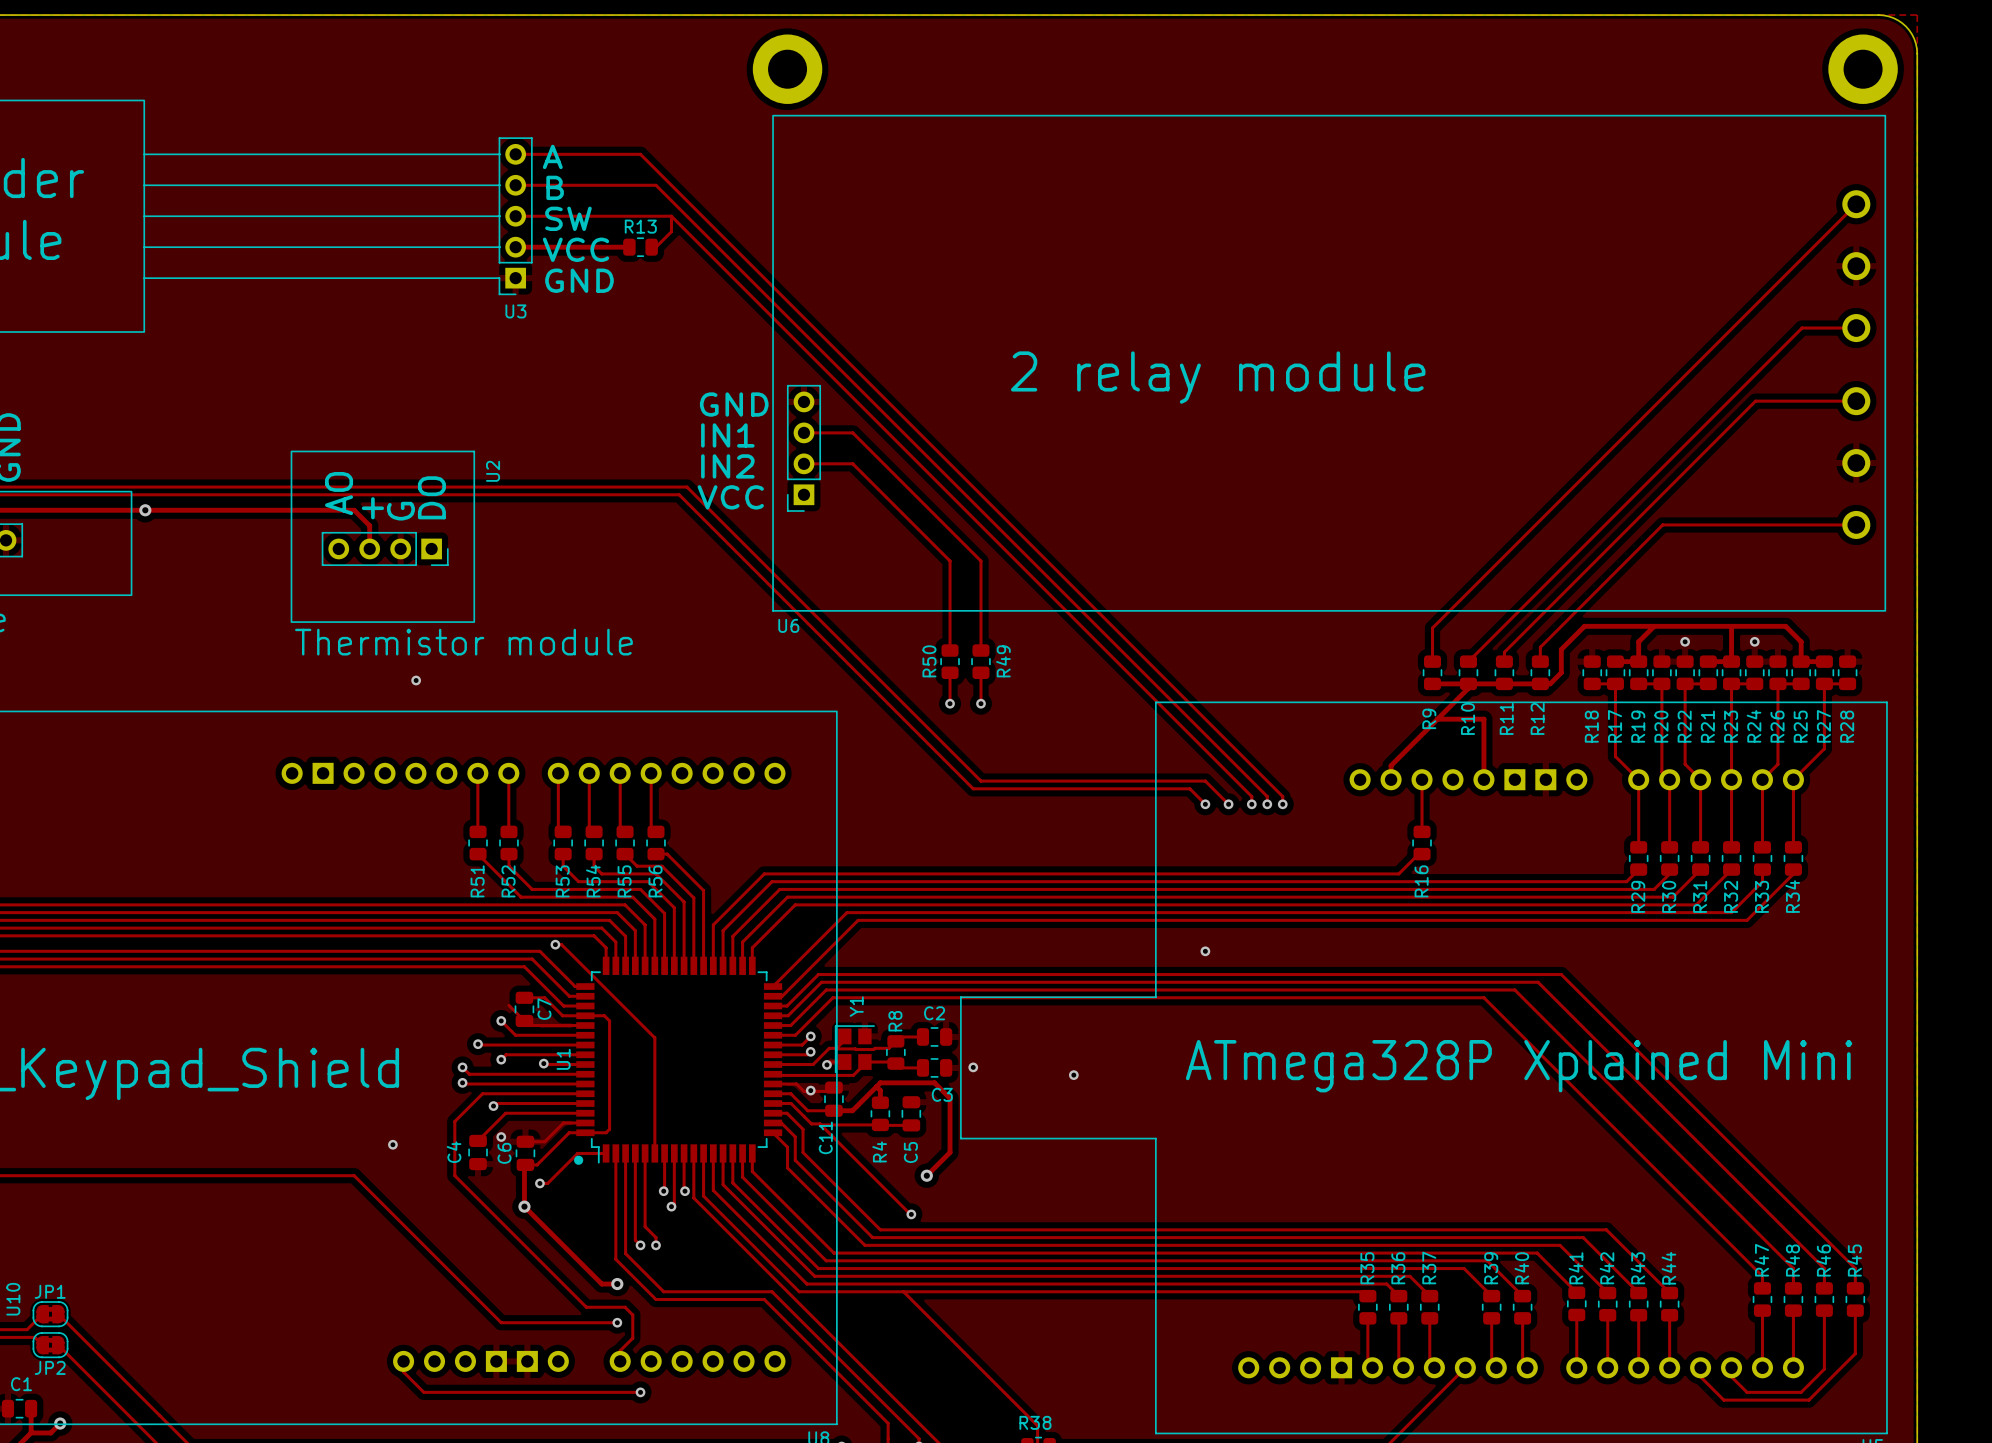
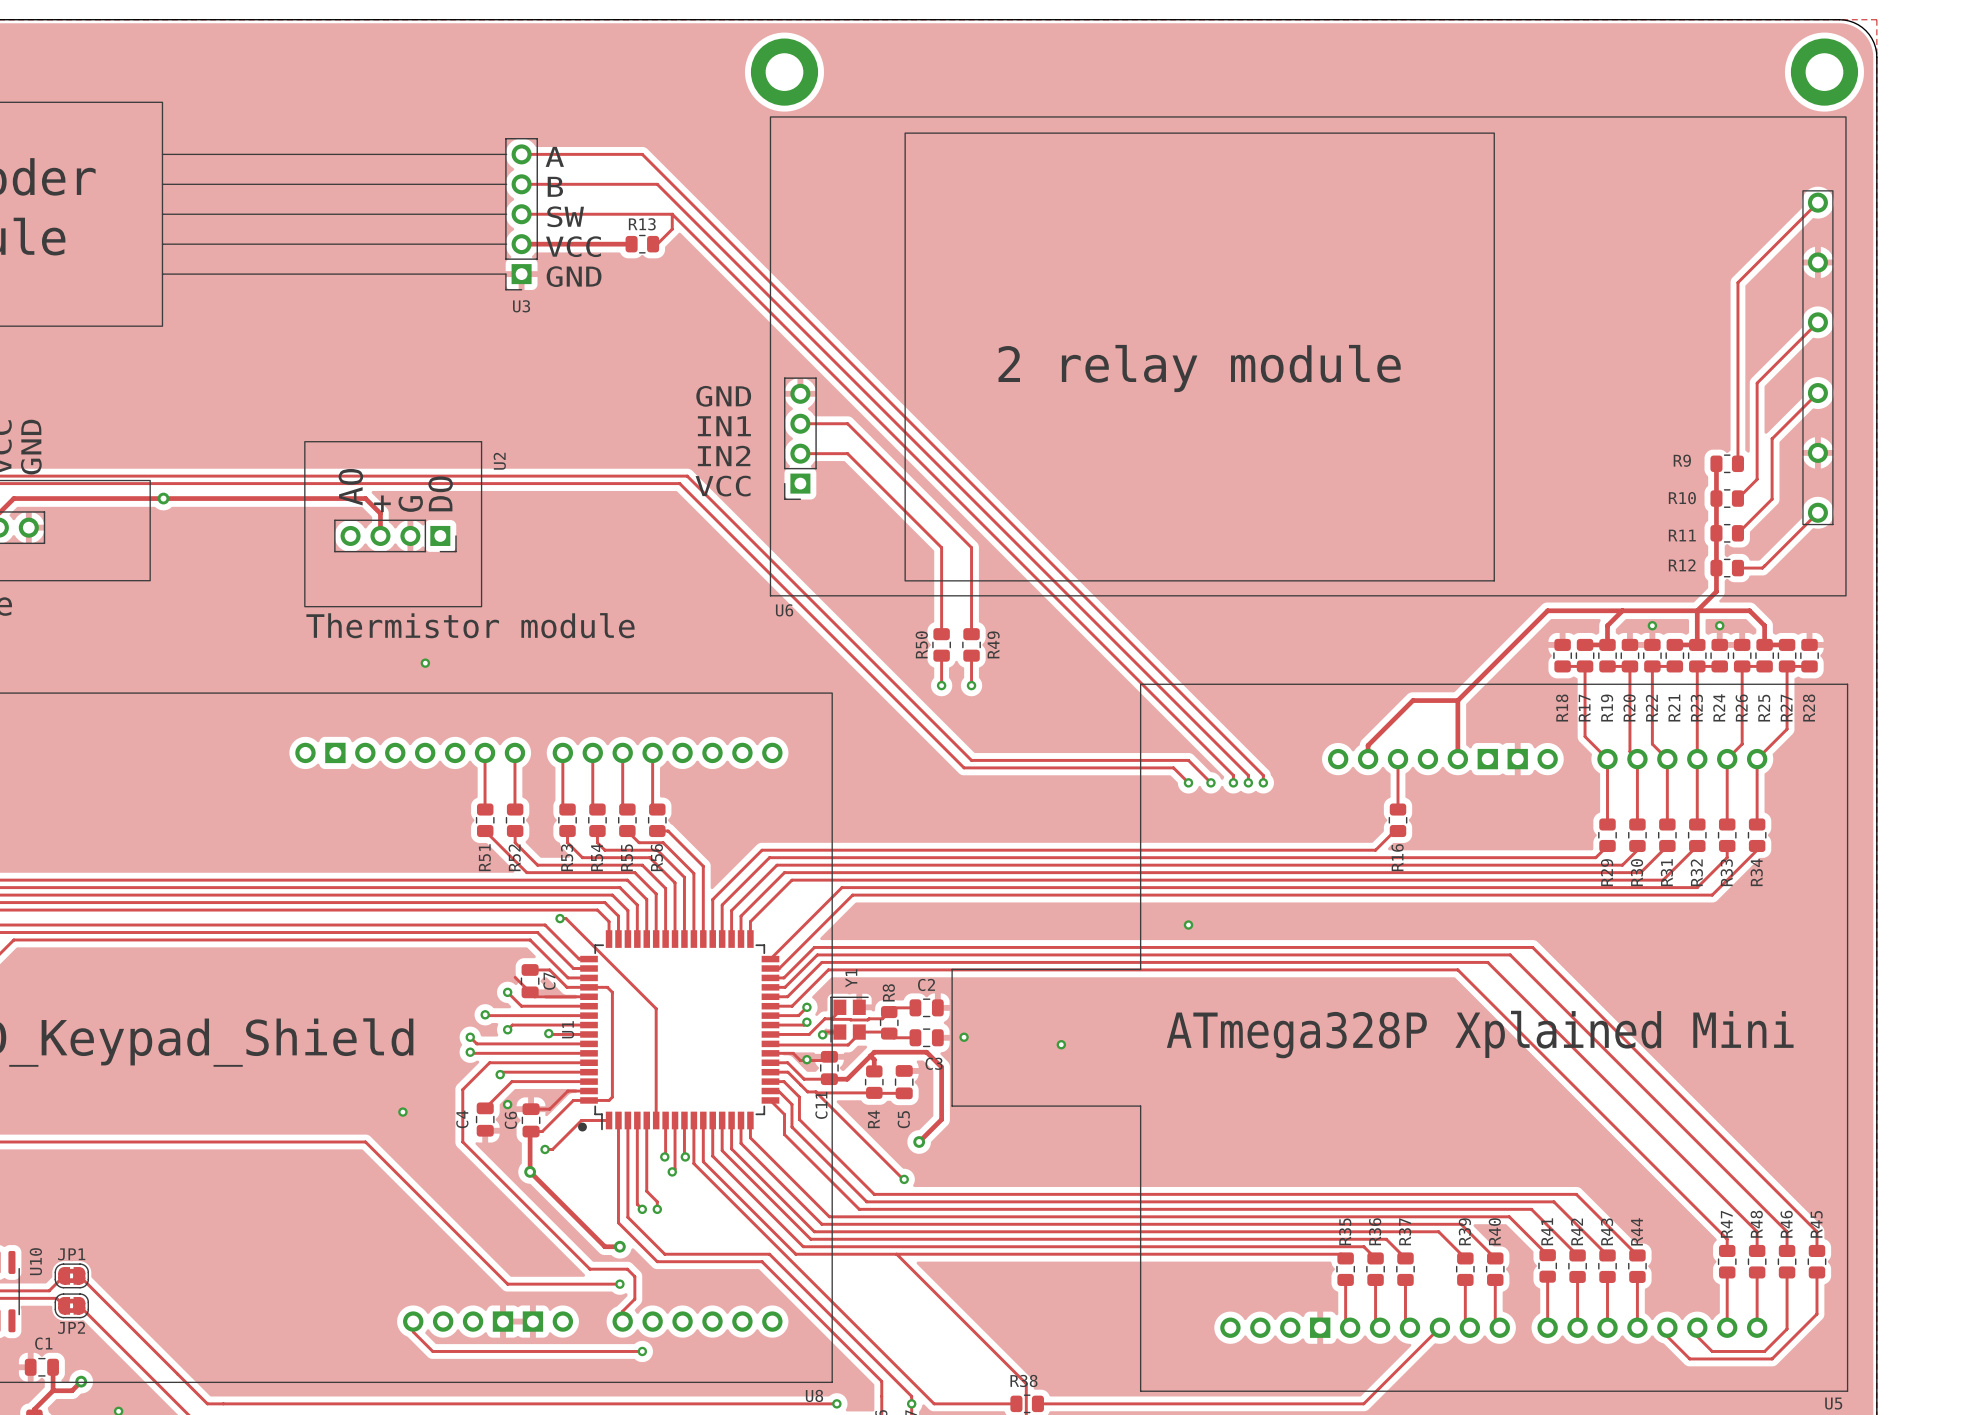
U6 footprint: [772, 99, 1886, 612] -> [769, 101, 1847, 597]
track: (1773, 286) (1432, 628) (1432, 661) -> (1737, 282) (1737, 463)
track: (1856, 328) (1802, 328) (1468, 661) -> (1817, 322) (1757, 383) (1757, 479) (1737, 498)
track: (1856, 401) (1755, 401) (1504, 652) (1504, 661) -> (1817, 393) (1772, 438)
track: none -> (1772, 438) (1772, 499) (1737, 533)
track: none -> (1716, 463) (1716, 591) (1697, 610)
track: (1856, 524) (1662, 524) (1540, 647) (1540, 661) -> (1817, 512) (1764, 565)
track: none -> (1764, 565) (1762, 568) (1737, 568)
track: (1584, 626) (1561, 649) (1561, 672) (1550, 683) (1432, 683) -> (1555, 610) (1547, 610) (1457, 700)
R9 rotation: 0° (1432, 672) -> 90° clockwise (1727, 463)
R9 position: (1432, 672) -> (1727, 463)
R10 rotation: 0° (1468, 672) -> 90° clockwise (1727, 498)
R10 position: (1468, 672) -> (1727, 498)
R11 rotation: 0° (1504, 672) -> 90° clockwise (1727, 533)
R11 position: (1504, 672) -> (1727, 533)
R12 rotation: 0° (1540, 672) -> 90° clockwise (1727, 568)
R12 position: (1540, 672) -> (1727, 568)
track: (1468, 683) (1468, 688) (1437, 719) -> none

